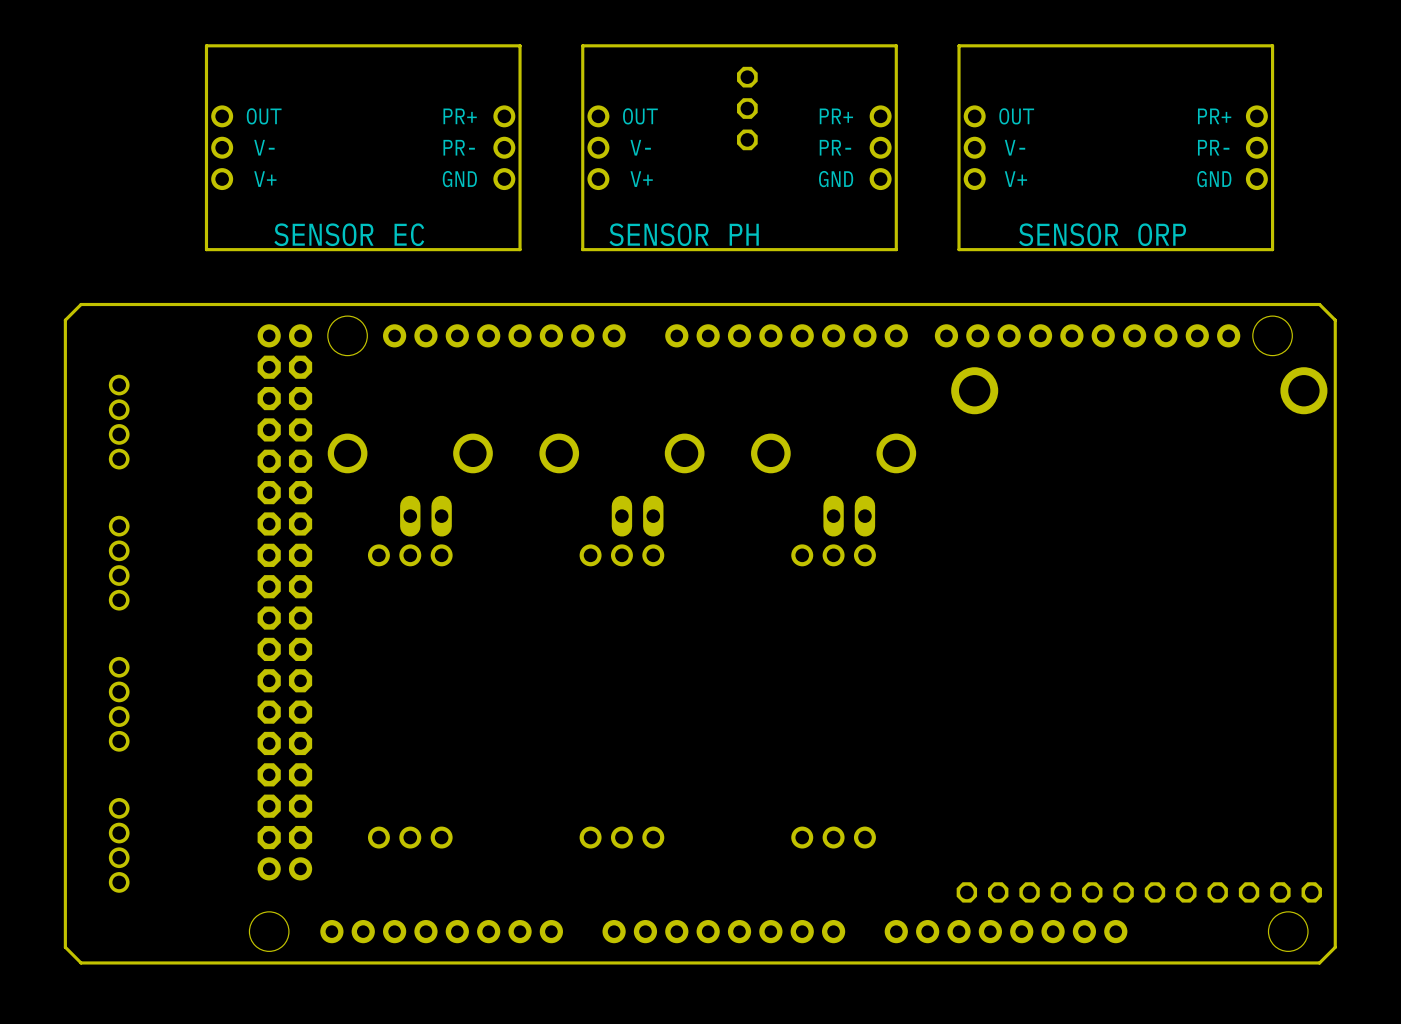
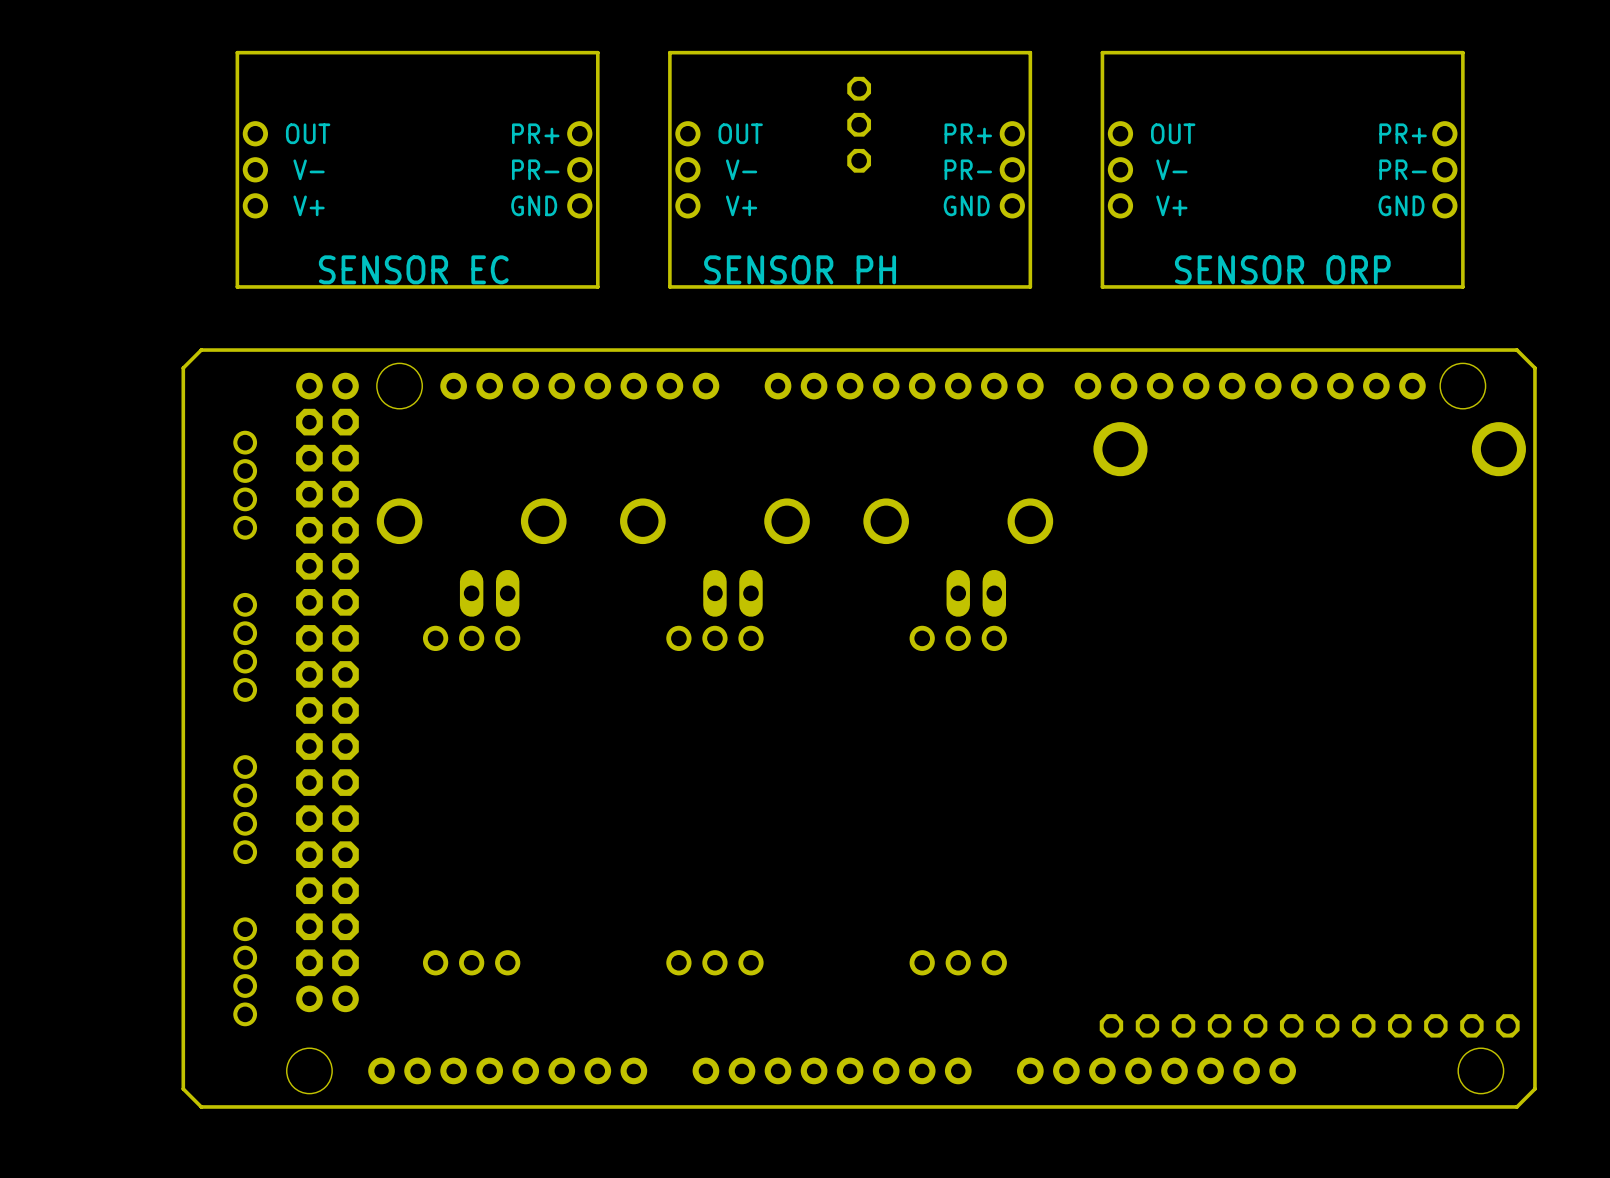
board edge: (175, 304) (81, 304) (65, 320) (65, 947) (81, 962) (175, 962) -> (201, 350) (183, 368) (183, 1088) (201, 1106)
part: (119, 422) -> none
part: none -> (245, 485)
part: (119, 563) -> none
part: none -> (245, 647)
part: (119, 704) -> none
part: none -> (245, 809)
part: (119, 845) -> none
part: none -> (245, 971)

